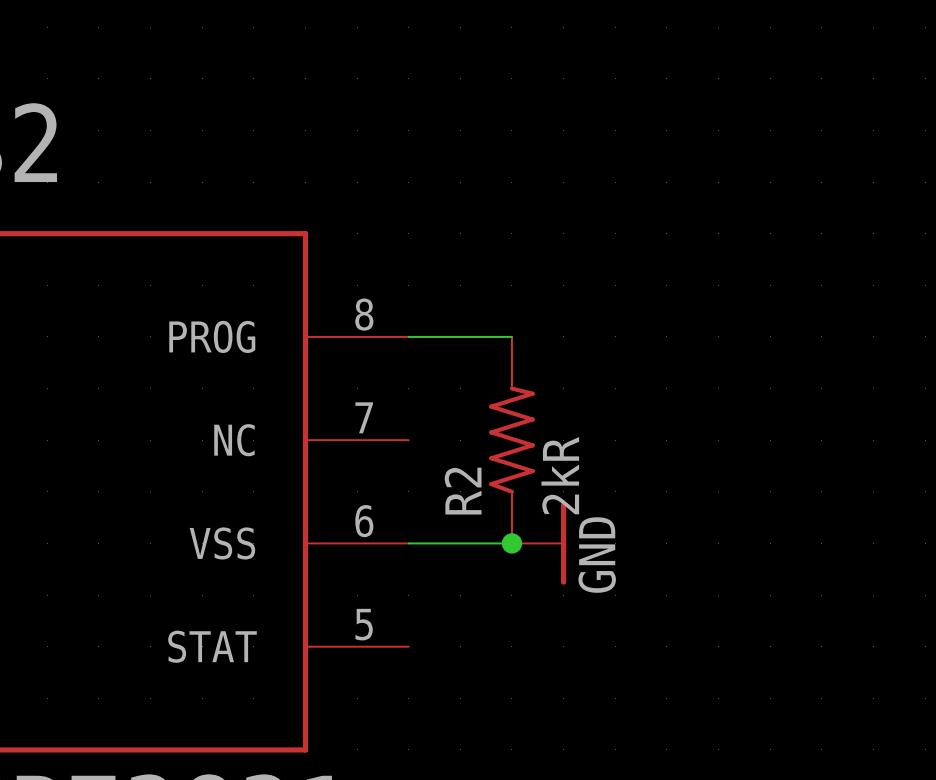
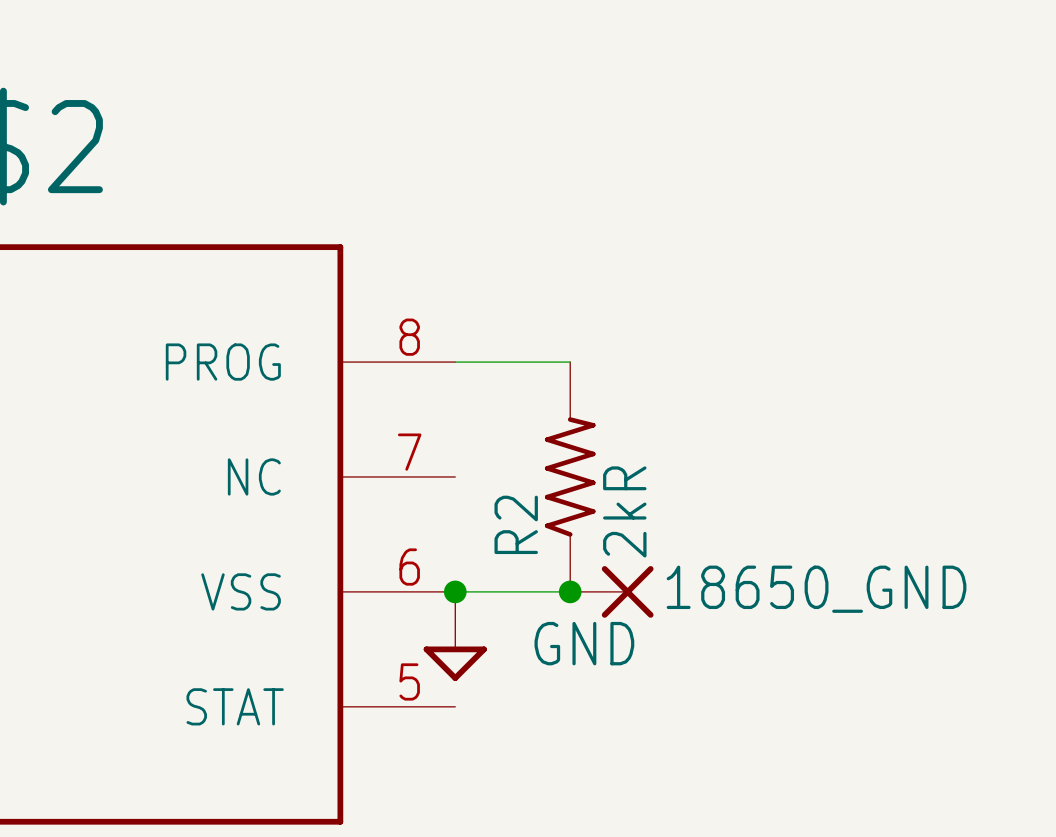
junction: none -> (455, 591)
power symbol: GND (539, 543) -> none
18650_GND: none -> (611, 591)
power symbol: none -> GND (455, 636)

